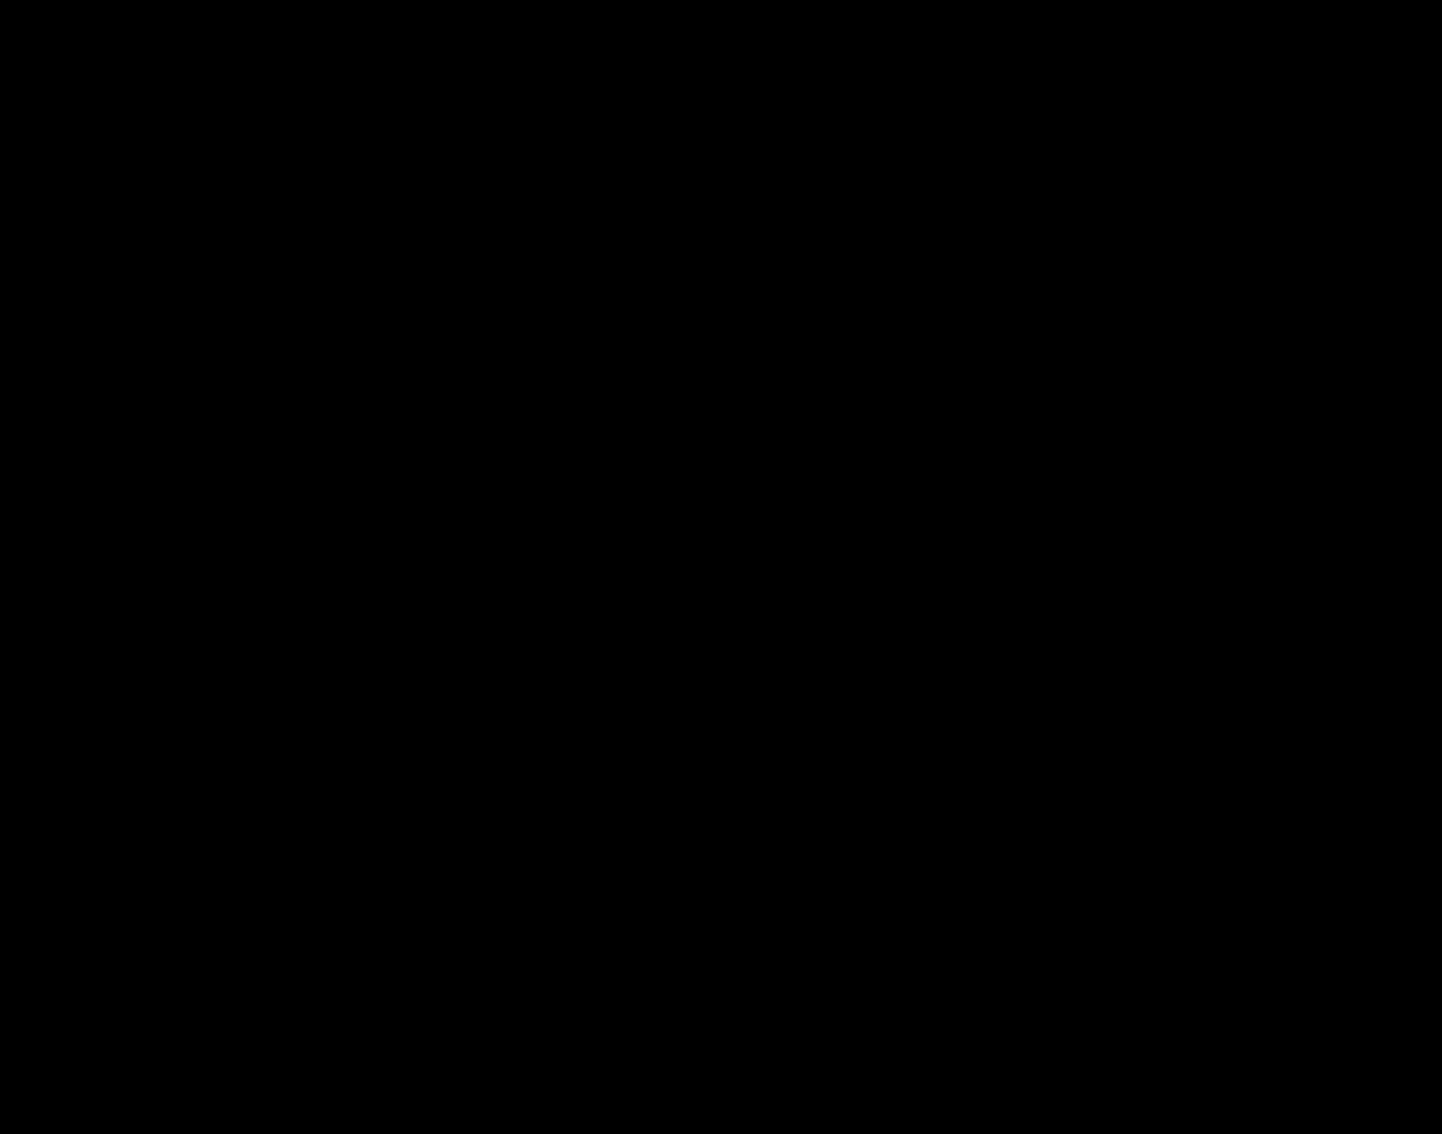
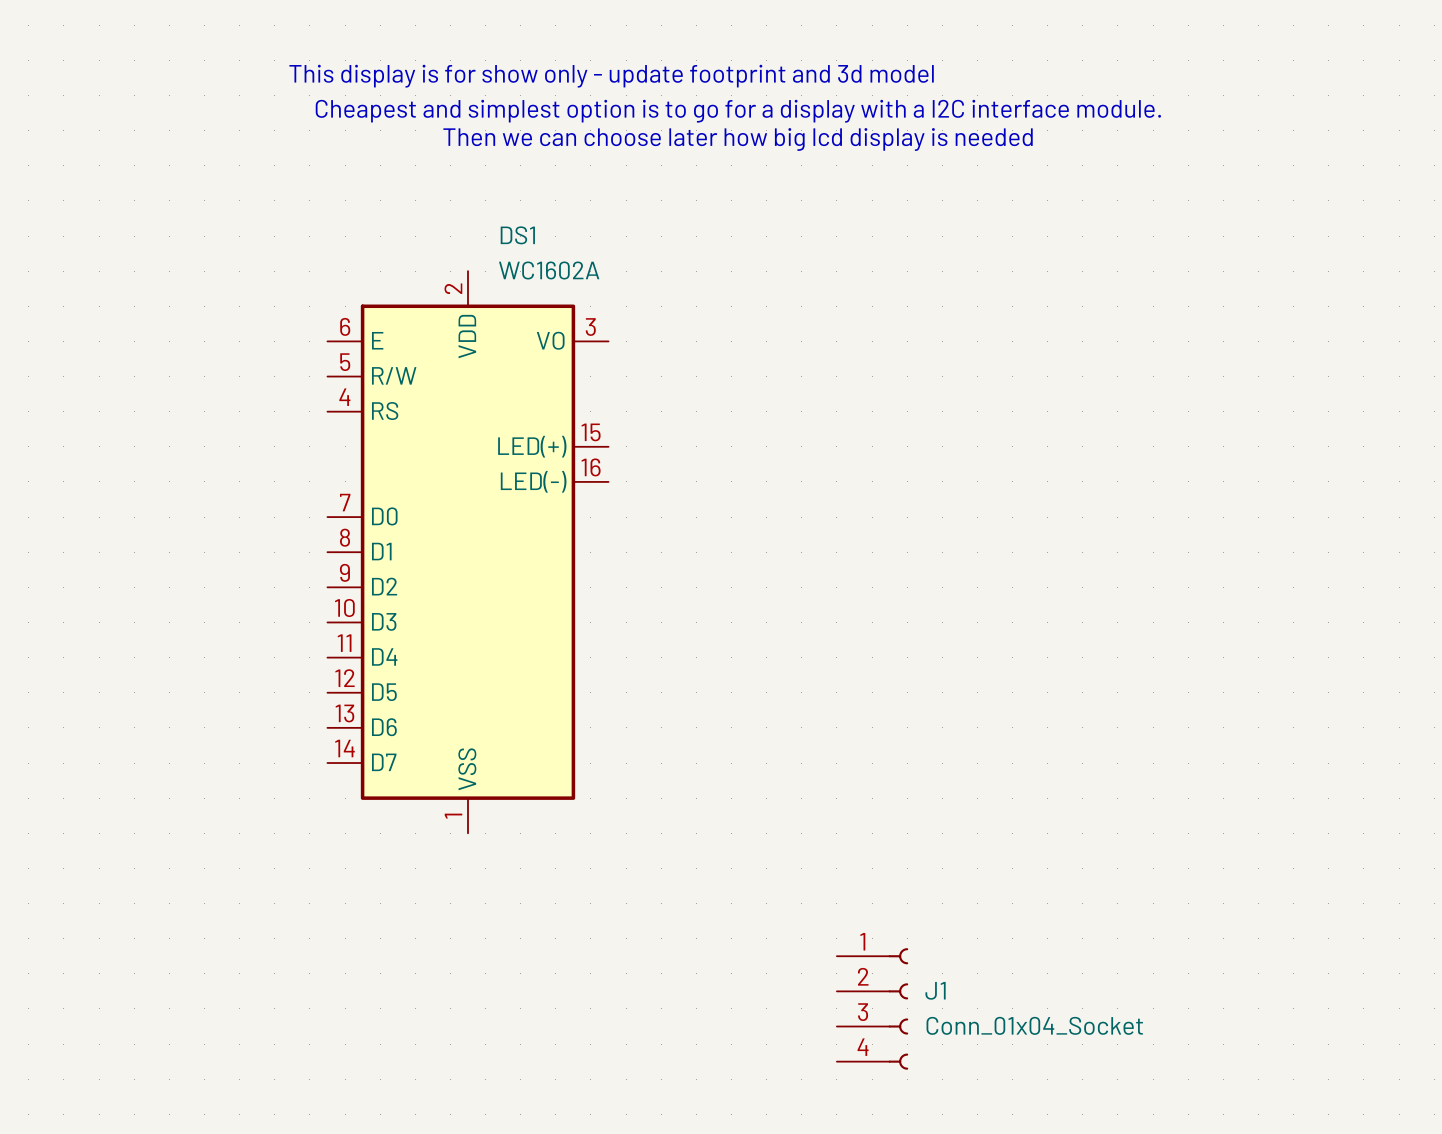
text: none -> This display is for show only - update footprint and 3d model (611, 76)
text: none -> Cheapest and simplest option is to go for a display with a I2C interface module. (738, 111)
text: none -> Then we can choose later how big lcd display is needed (738, 139)
DS1: none -> WC1602A (468, 552)
J1: none -> Conn_01x04_Socket (872, 1008)

